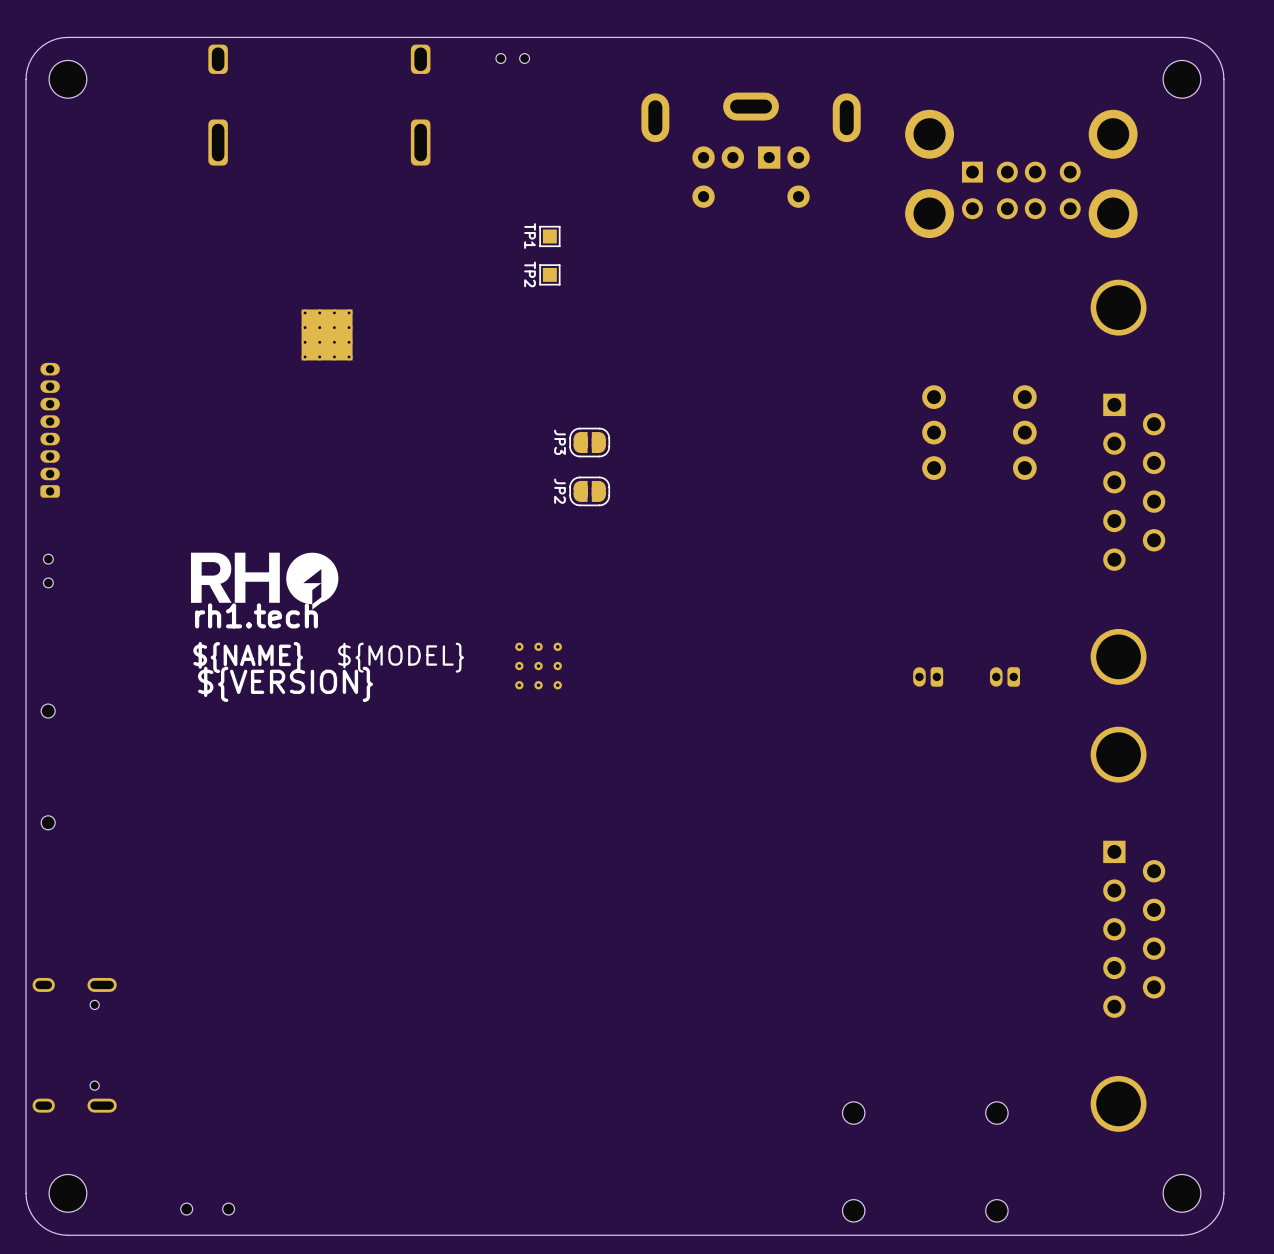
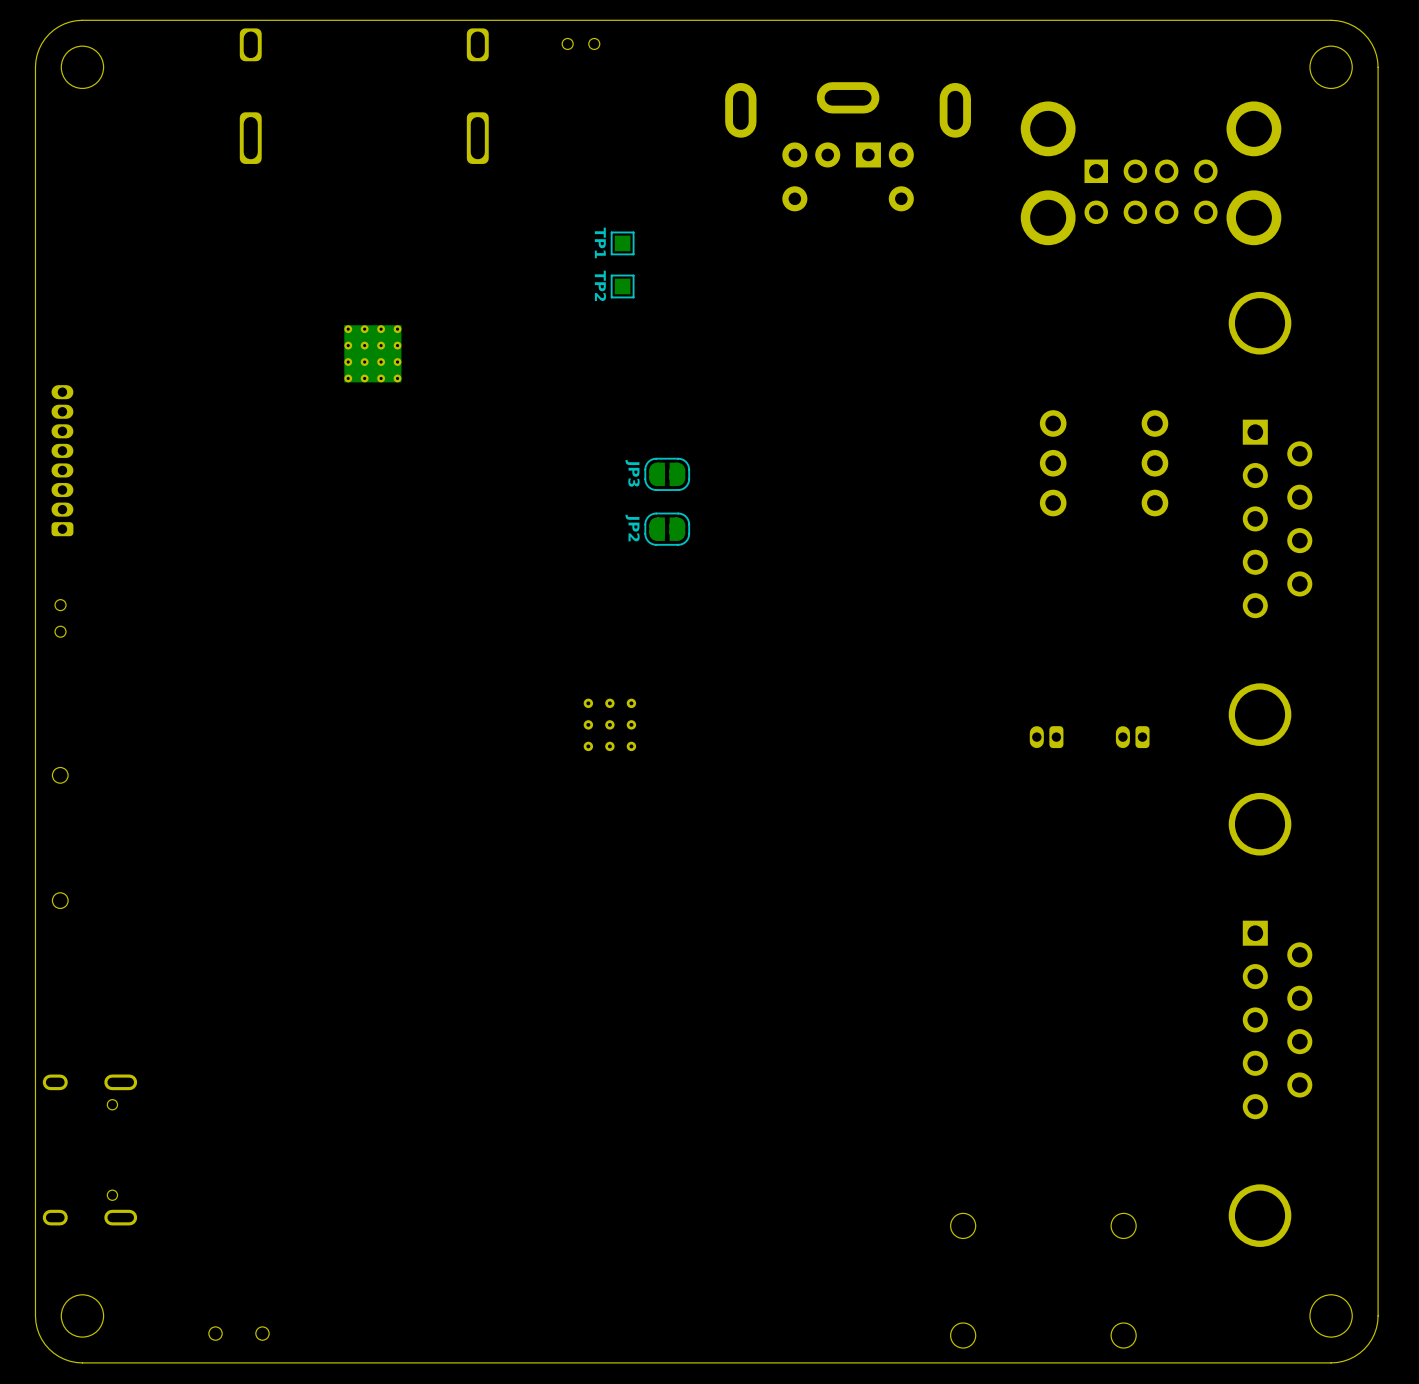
drawing: [190, 552, 339, 610] -> none
text: rh1.tech (256, 615) -> none
text: ${NAME} (248, 657) -> none
text: ${MODEL} (401, 657) -> none
text: ${VERSION} (285, 684) -> none

